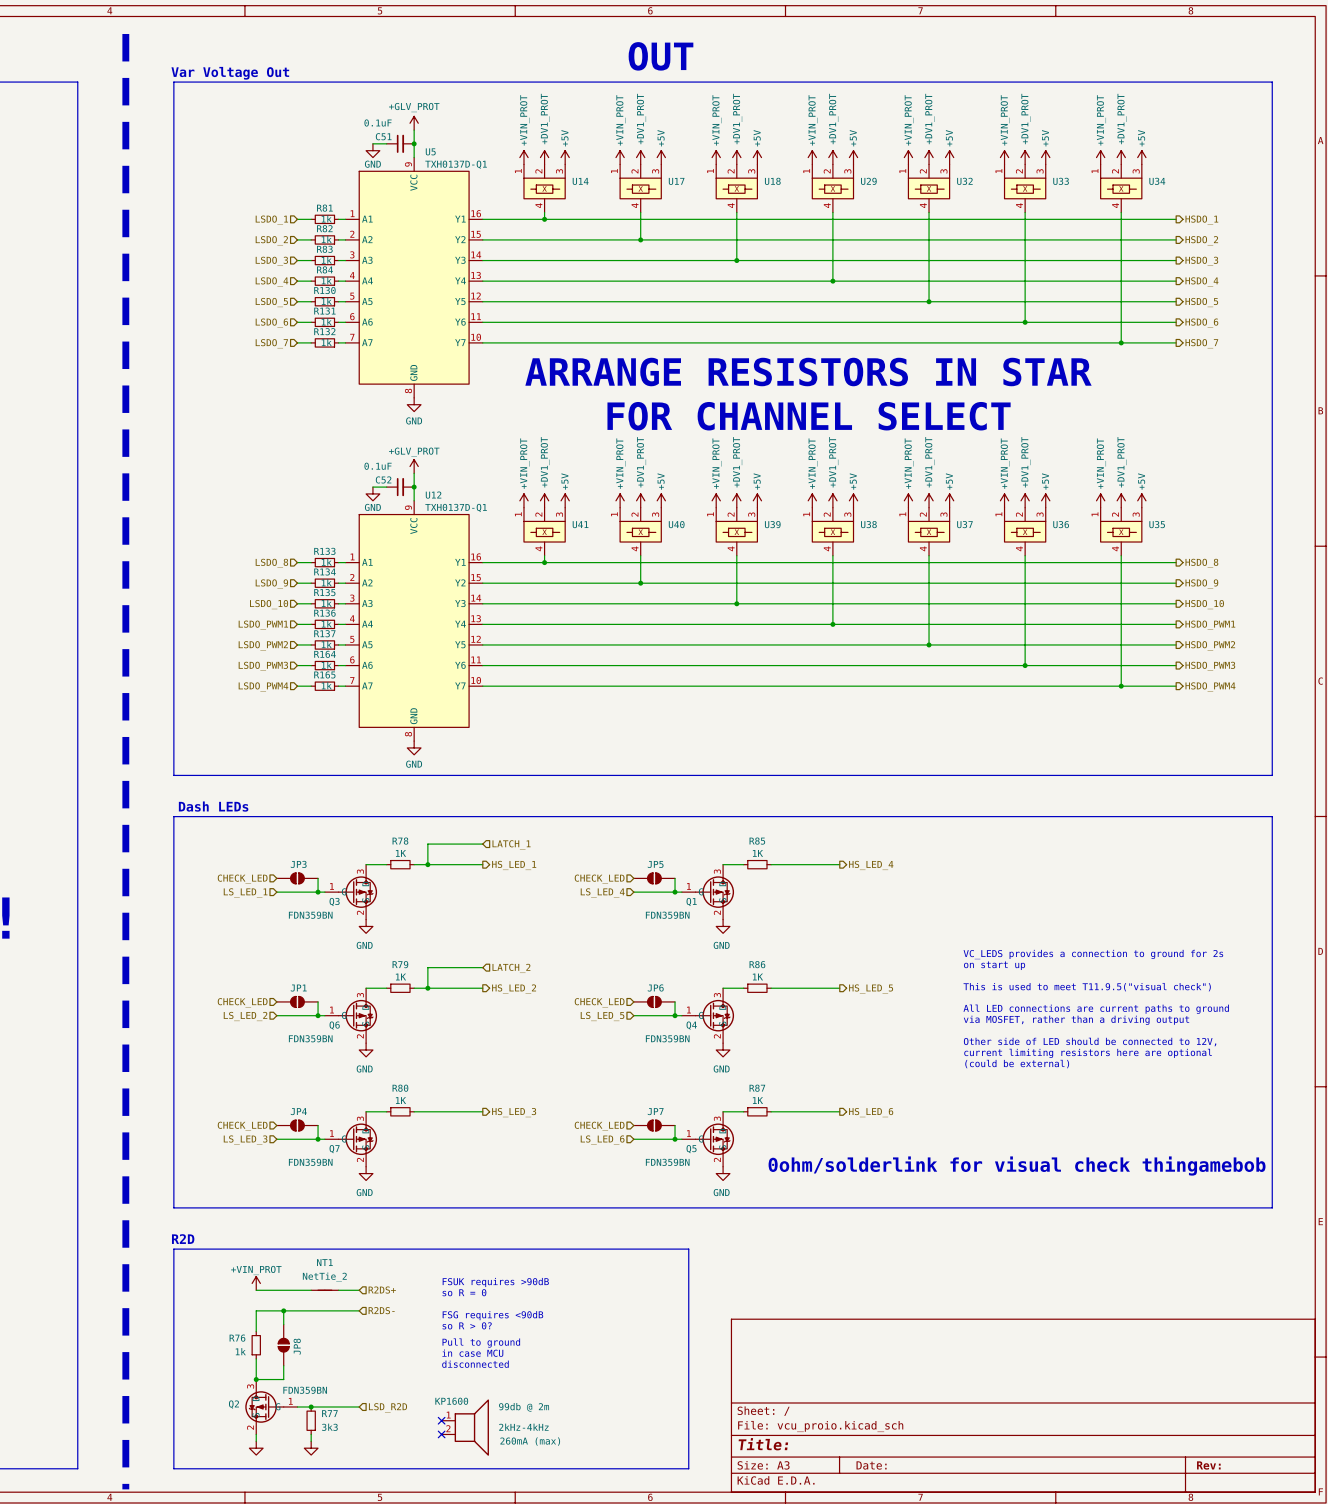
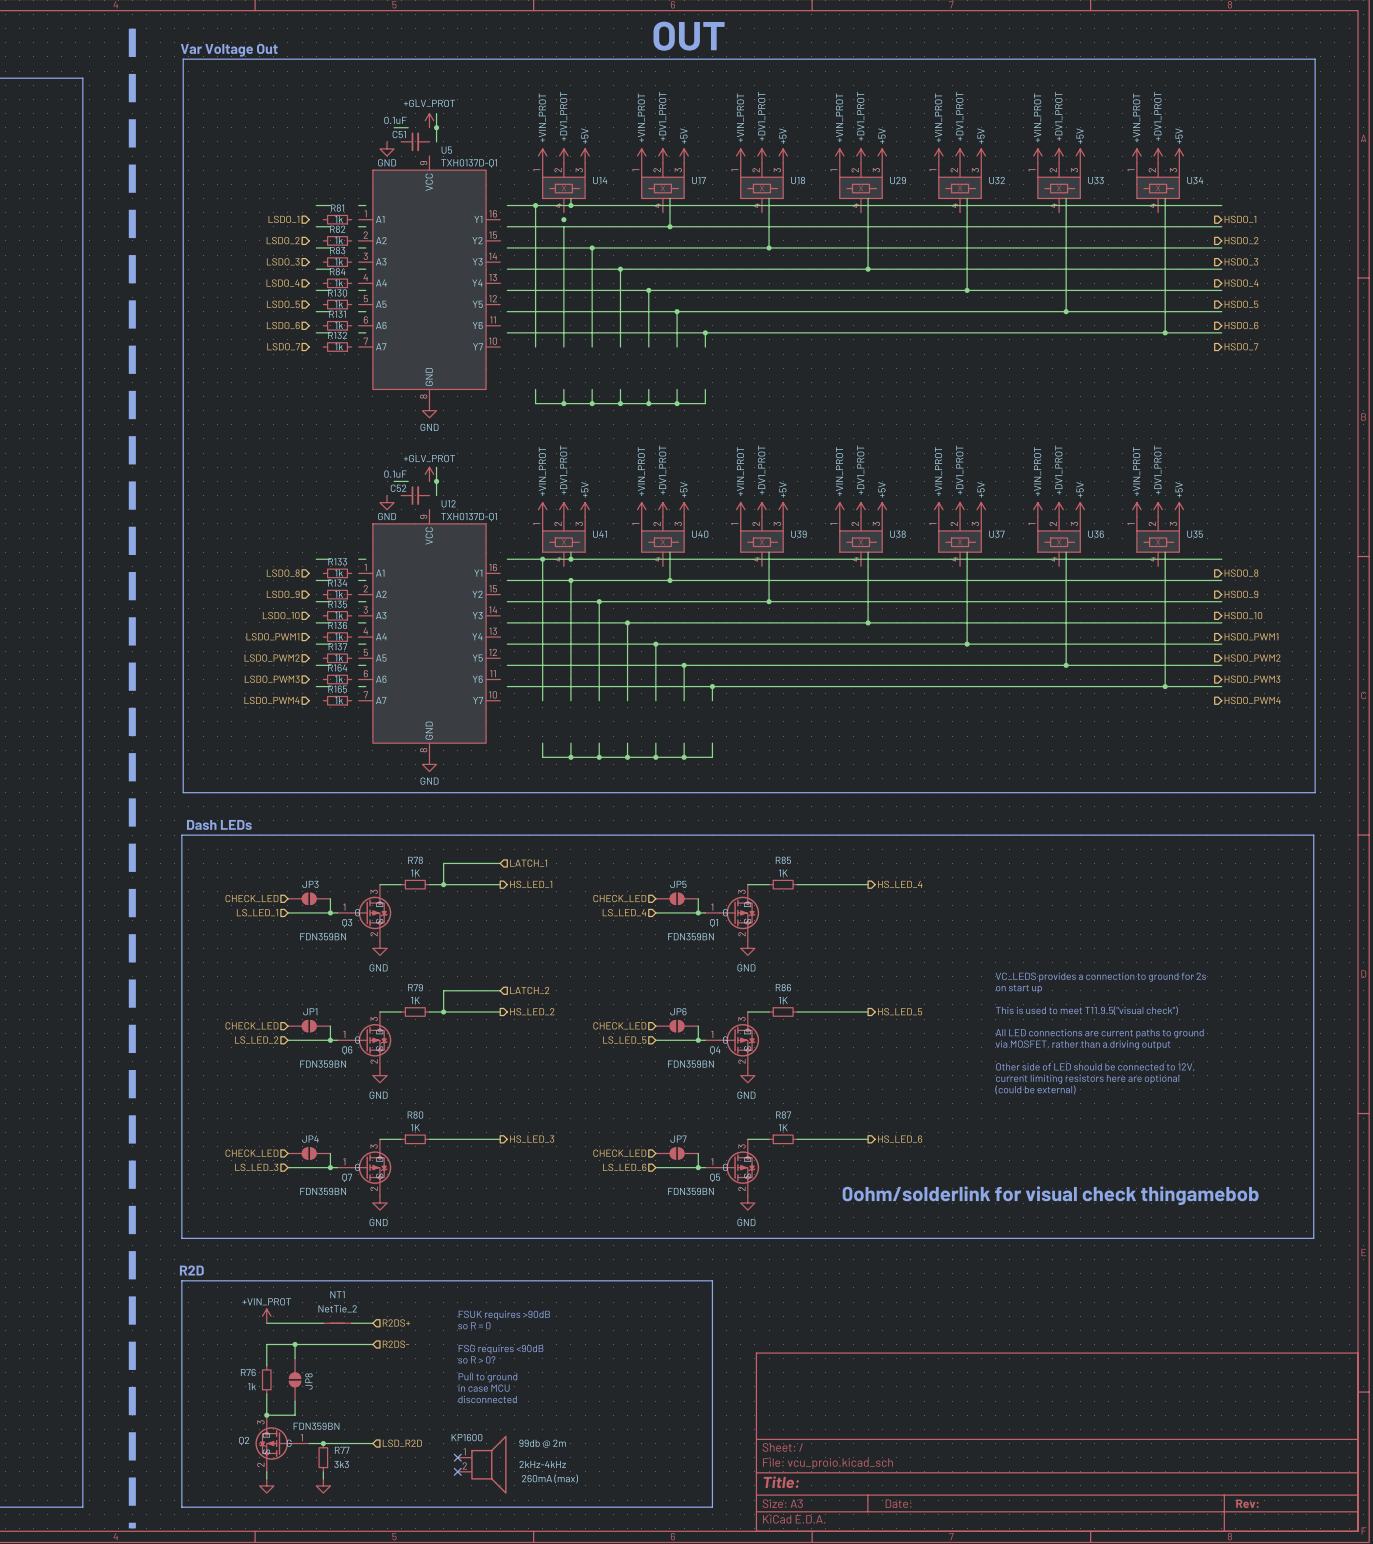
text position: OUT (660, 56) -> OUT (689, 36)
text position: Var Voltage Out (230, 73) -> Var Voltage Out (229, 50)
wire: (414, 130) (414, 157) -> (436, 113) (436, 141)
wire: (372, 143) (386, 143) -> (394, 127) (408, 127)
junction position: (414, 143) -> (436, 127)
wire: none -> (535, 205) (535, 347)
junction: none -> (535, 205)
junction: none -> (570, 205)
wire: (544, 212) (544, 219) -> (570, 198) (570, 205)
wire: (640, 212) (640, 239) -> (669, 198) (669, 226)
wire: (736, 212) (736, 260) -> (769, 198) (769, 247)
wire: (832, 212) (832, 281) -> (868, 198) (868, 269)
wire: (929, 212) (929, 301) -> (967, 198) (967, 290)
wire: (1025, 212) (1025, 322) -> (1066, 198) (1066, 311)
wire: (1121, 212) (1121, 342) -> (1165, 198) (1165, 332)
wire: (297, 219) (311, 219) -> (316, 205) (330, 205)
wire: (338, 219) (345, 219) -> (358, 205) (365, 205)
wire: (482, 219) (1176, 219) -> (507, 205) (1221, 205)
wire: none -> (563, 226) (563, 347)
wire: (297, 239) (311, 239) -> (316, 226) (330, 226)
wire: (338, 239) (345, 239) -> (358, 226) (365, 226)
wire: (482, 239) (1176, 239) -> (507, 226) (1221, 226)
junction position: (640, 239) -> (669, 226)
wire: none -> (592, 247) (592, 347)
junction: none -> (592, 247)
wire: (297, 260) (311, 260) -> (316, 247) (330, 247)
wire: (338, 260) (345, 260) -> (358, 247) (365, 247)
wire: (482, 260) (1176, 260) -> (507, 247) (1221, 247)
junction position: (736, 260) -> (769, 247)
wire: none -> (620, 269) (620, 347)
junction: none -> (620, 269)
wire: (297, 281) (311, 281) -> (316, 269) (330, 269)
wire: (338, 281) (345, 281) -> (358, 269) (365, 269)
wire: (482, 281) (1176, 281) -> (507, 269) (1221, 269)
junction position: (832, 281) -> (868, 269)
wire: none -> (648, 290) (648, 347)
junction: none -> (648, 290)
wire: (297, 301) (311, 301) -> (316, 290) (330, 290)
wire: (338, 301) (345, 301) -> (358, 290) (365, 290)
wire: (482, 301) (1176, 301) -> (507, 290) (1221, 290)
junction position: (929, 301) -> (967, 290)
wire: none -> (677, 311) (677, 347)
junction: none -> (677, 311)
wire: (297, 322) (311, 322) -> (316, 311) (330, 311)
wire: (338, 322) (345, 322) -> (358, 311) (365, 311)
wire: (482, 322) (1176, 322) -> (507, 311) (1221, 311)
junction position: (1025, 322) -> (1066, 311)
wire: none -> (705, 332) (705, 347)
junction: none -> (705, 332)
wire: (297, 342) (311, 342) -> (316, 332) (330, 332)
wire: (338, 342) (345, 342) -> (358, 332) (365, 332)
wire: (482, 342) (1176, 342) -> (507, 332) (1221, 332)
junction position: (1121, 342) -> (1165, 332)
text: ARRANGE RESISTORS IN STAR (808, 372) -> none
wire: none -> (535, 389) (535, 403) (705, 403) (705, 389)
wire: none -> (563, 389) (563, 403)
wire: none -> (592, 389) (592, 403)
wire: none -> (620, 389) (620, 403)
wire: none -> (648, 389) (648, 403)
wire: none -> (677, 389) (677, 403)
junction: none -> (563, 403)
junction: none -> (592, 403)
junction: none -> (620, 403)
junction: none -> (648, 403)
junction: none -> (677, 403)
text: FOR CHANNEL SELECT (809, 416) -> none
wire: (414, 473) (414, 500) -> (436, 467) (436, 495)
wire: (372, 487) (386, 487) -> (394, 481) (408, 481)
junction position: (414, 487) -> (436, 481)
wire: none -> (542, 559) (542, 700)
junction: none -> (542, 559)
junction: none -> (570, 559)
wire: (544, 555) (544, 562) -> (570, 552) (570, 559)
wire: (640, 555) (640, 583) -> (669, 552) (669, 580)
wire: (736, 555) (736, 603) -> (769, 552) (769, 601)
wire: (832, 555) (832, 624) -> (868, 552) (868, 622)
wire: (929, 555) (929, 644) -> (967, 552) (967, 644)
wire: (1025, 555) (1025, 665) -> (1066, 552) (1066, 665)
wire: (1121, 555) (1121, 686) -> (1165, 552) (1165, 686)
wire: (297, 562) (311, 562) -> (316, 559) (330, 559)
wire: (338, 562) (345, 562) -> (358, 559) (365, 559)
wire: (482, 562) (1176, 562) -> (507, 559) (1221, 559)
junction: (544, 562) -> none
wire: none -> (570, 580) (570, 700)
junction: none -> (570, 580)
wire: (297, 583) (311, 583) -> (316, 580) (330, 580)
wire: (338, 583) (345, 583) -> (358, 580) (365, 580)
wire: (482, 583) (1176, 583) -> (507, 580) (1221, 580)
junction position: (640, 583) -> (669, 580)
wire: none -> (599, 601) (599, 700)
junction: none -> (599, 601)
wire: (297, 603) (311, 603) -> (316, 601) (330, 601)
wire: (338, 603) (345, 603) -> (358, 601) (365, 601)
wire: (482, 603) (1176, 603) -> (507, 601) (1221, 601)
junction position: (736, 603) -> (769, 601)
wire: none -> (627, 622) (627, 700)
junction: none -> (627, 622)
wire: (297, 624) (311, 624) -> (316, 622) (330, 622)
wire: (338, 624) (345, 624) -> (358, 622) (365, 622)
wire: (482, 624) (1176, 624) -> (507, 622) (1221, 622)
junction position: (832, 624) -> (868, 622)
wire: none -> (655, 644) (655, 700)
junction: none -> (655, 644)
wire: (297, 644) (311, 644) -> (316, 644) (330, 644)
wire: (338, 644) (345, 644) -> (358, 644) (365, 644)
wire: (482, 644) (1176, 644) -> (507, 644) (1221, 644)
junction position: (929, 644) -> (967, 644)
wire: none -> (684, 665) (684, 700)
junction: none -> (684, 665)
wire: (297, 665) (311, 665) -> (316, 665) (330, 665)
wire: (338, 665) (345, 665) -> (358, 665) (365, 665)
wire: (482, 665) (1176, 665) -> (507, 665) (1221, 665)
junction position: (1025, 665) -> (1066, 665)
wire: none -> (712, 686) (712, 700)
junction: none -> (712, 686)
wire: (297, 686) (311, 686) -> (316, 686) (330, 686)
wire: (338, 686) (345, 686) -> (358, 686) (365, 686)
wire: (482, 686) (1176, 686) -> (507, 686) (1221, 686)
junction position: (1121, 686) -> (1165, 686)
wire: none -> (542, 743) (542, 757) (712, 757) (712, 743)
wire: none -> (570, 743) (570, 757)
wire: none -> (599, 743) (599, 757)
wire: none -> (627, 743) (627, 757)
wire: none -> (655, 743) (655, 757)
wire: none -> (684, 743) (684, 757)
junction: none -> (570, 757)
junction: none -> (599, 757)
junction: none -> (627, 757)
junction: none -> (655, 757)
junction: none -> (684, 757)
line: (175, 775) (173, 82) (1272, 82) (1272, 775) -> (183, 792) (183, 59) (1315, 59) (1313, 792)

